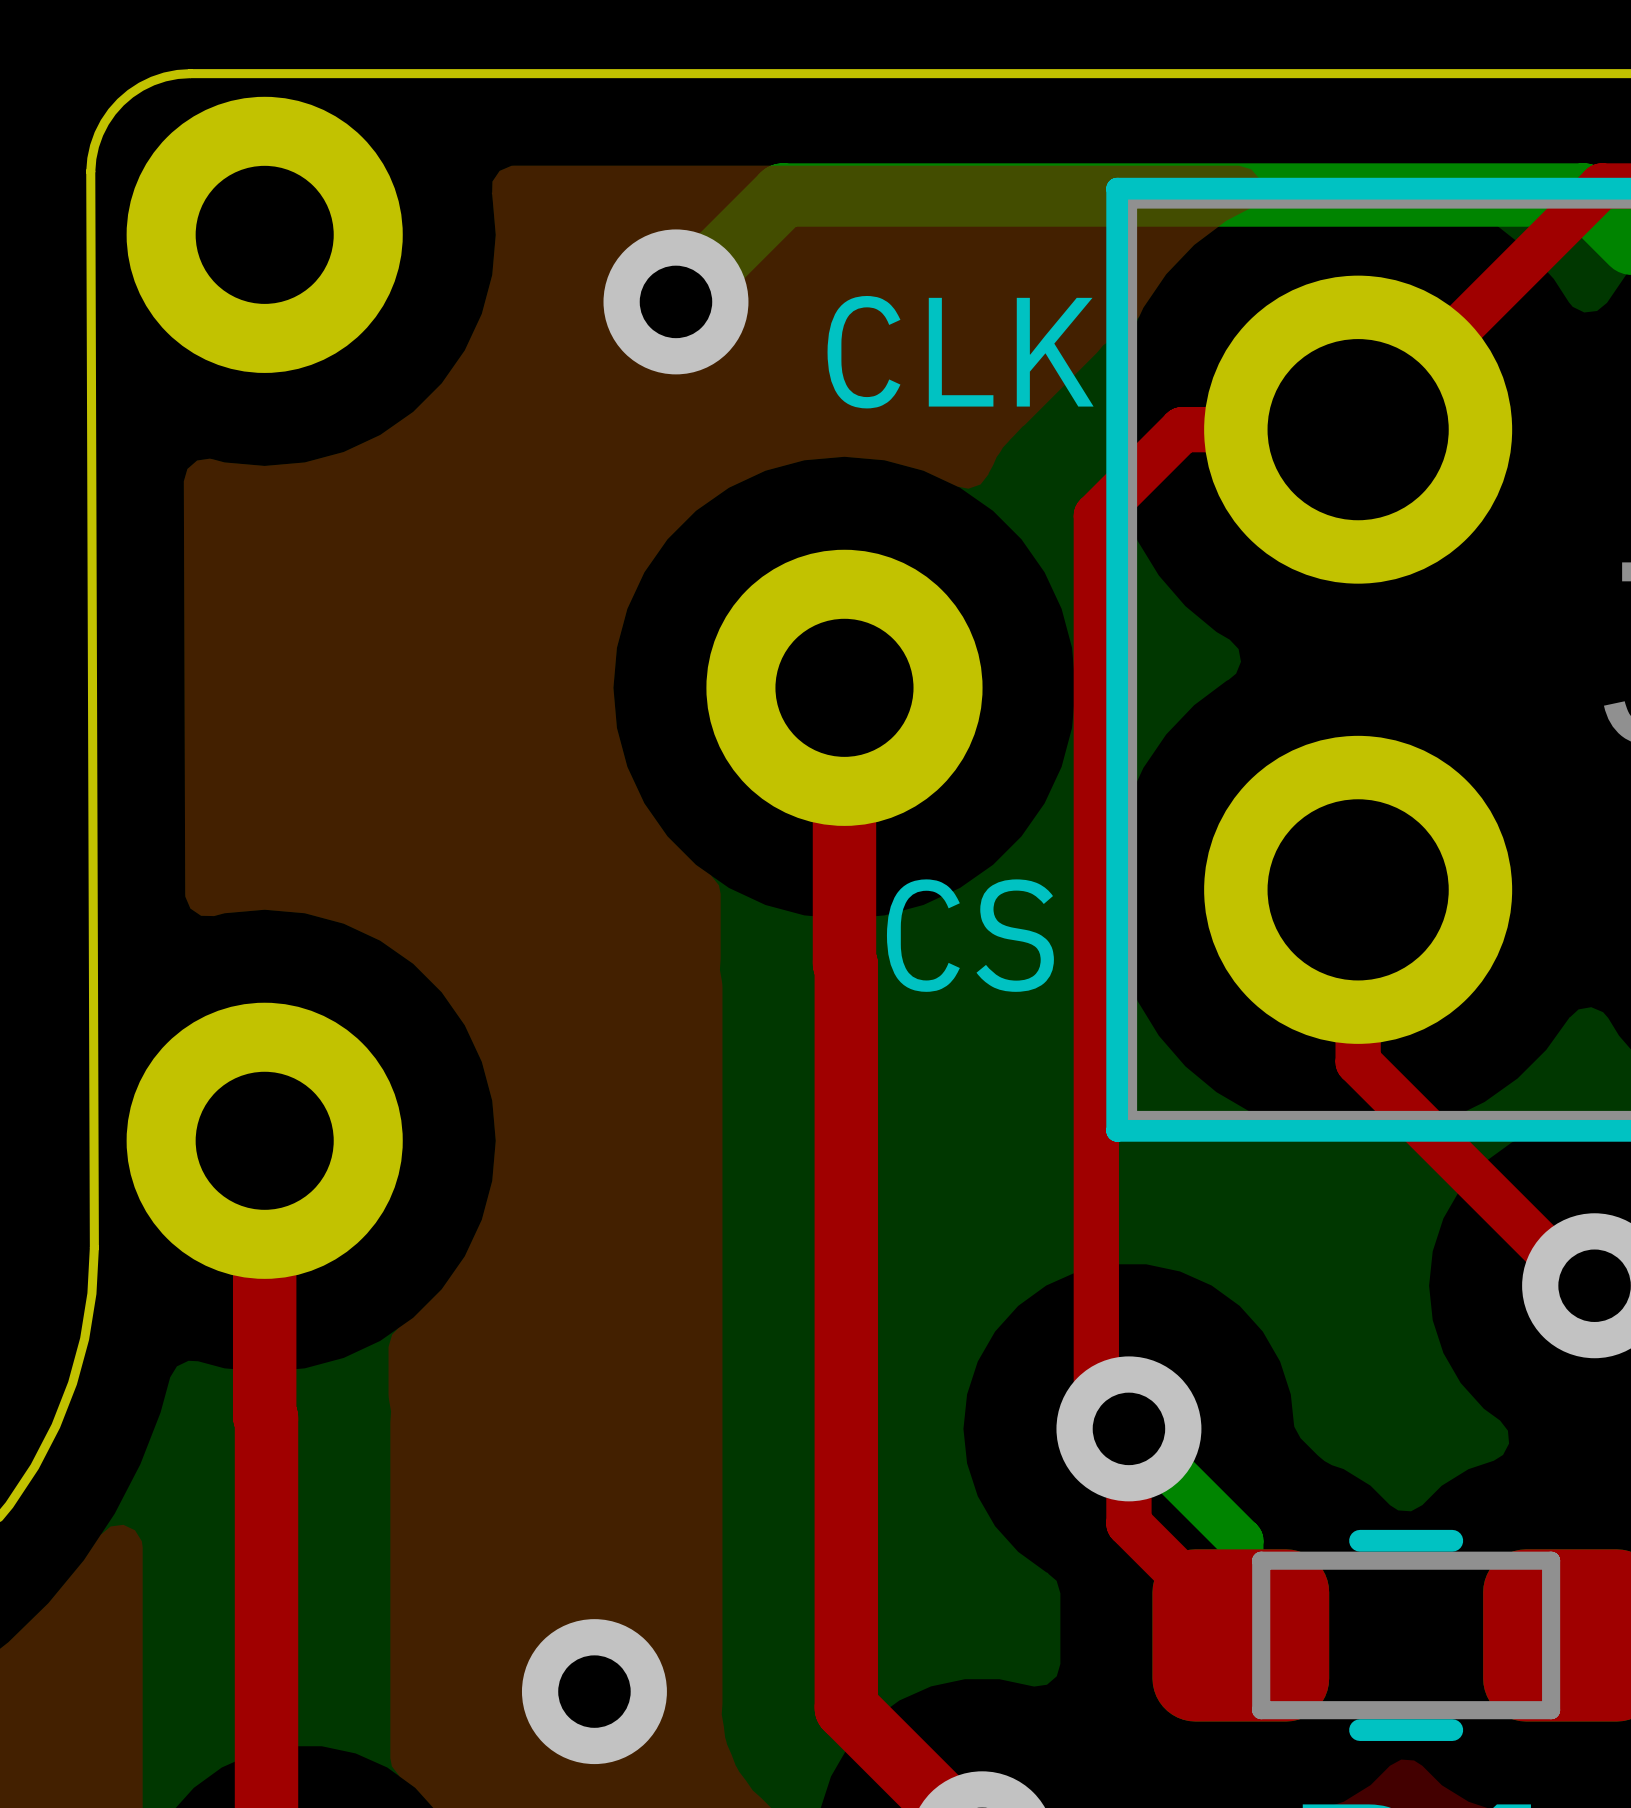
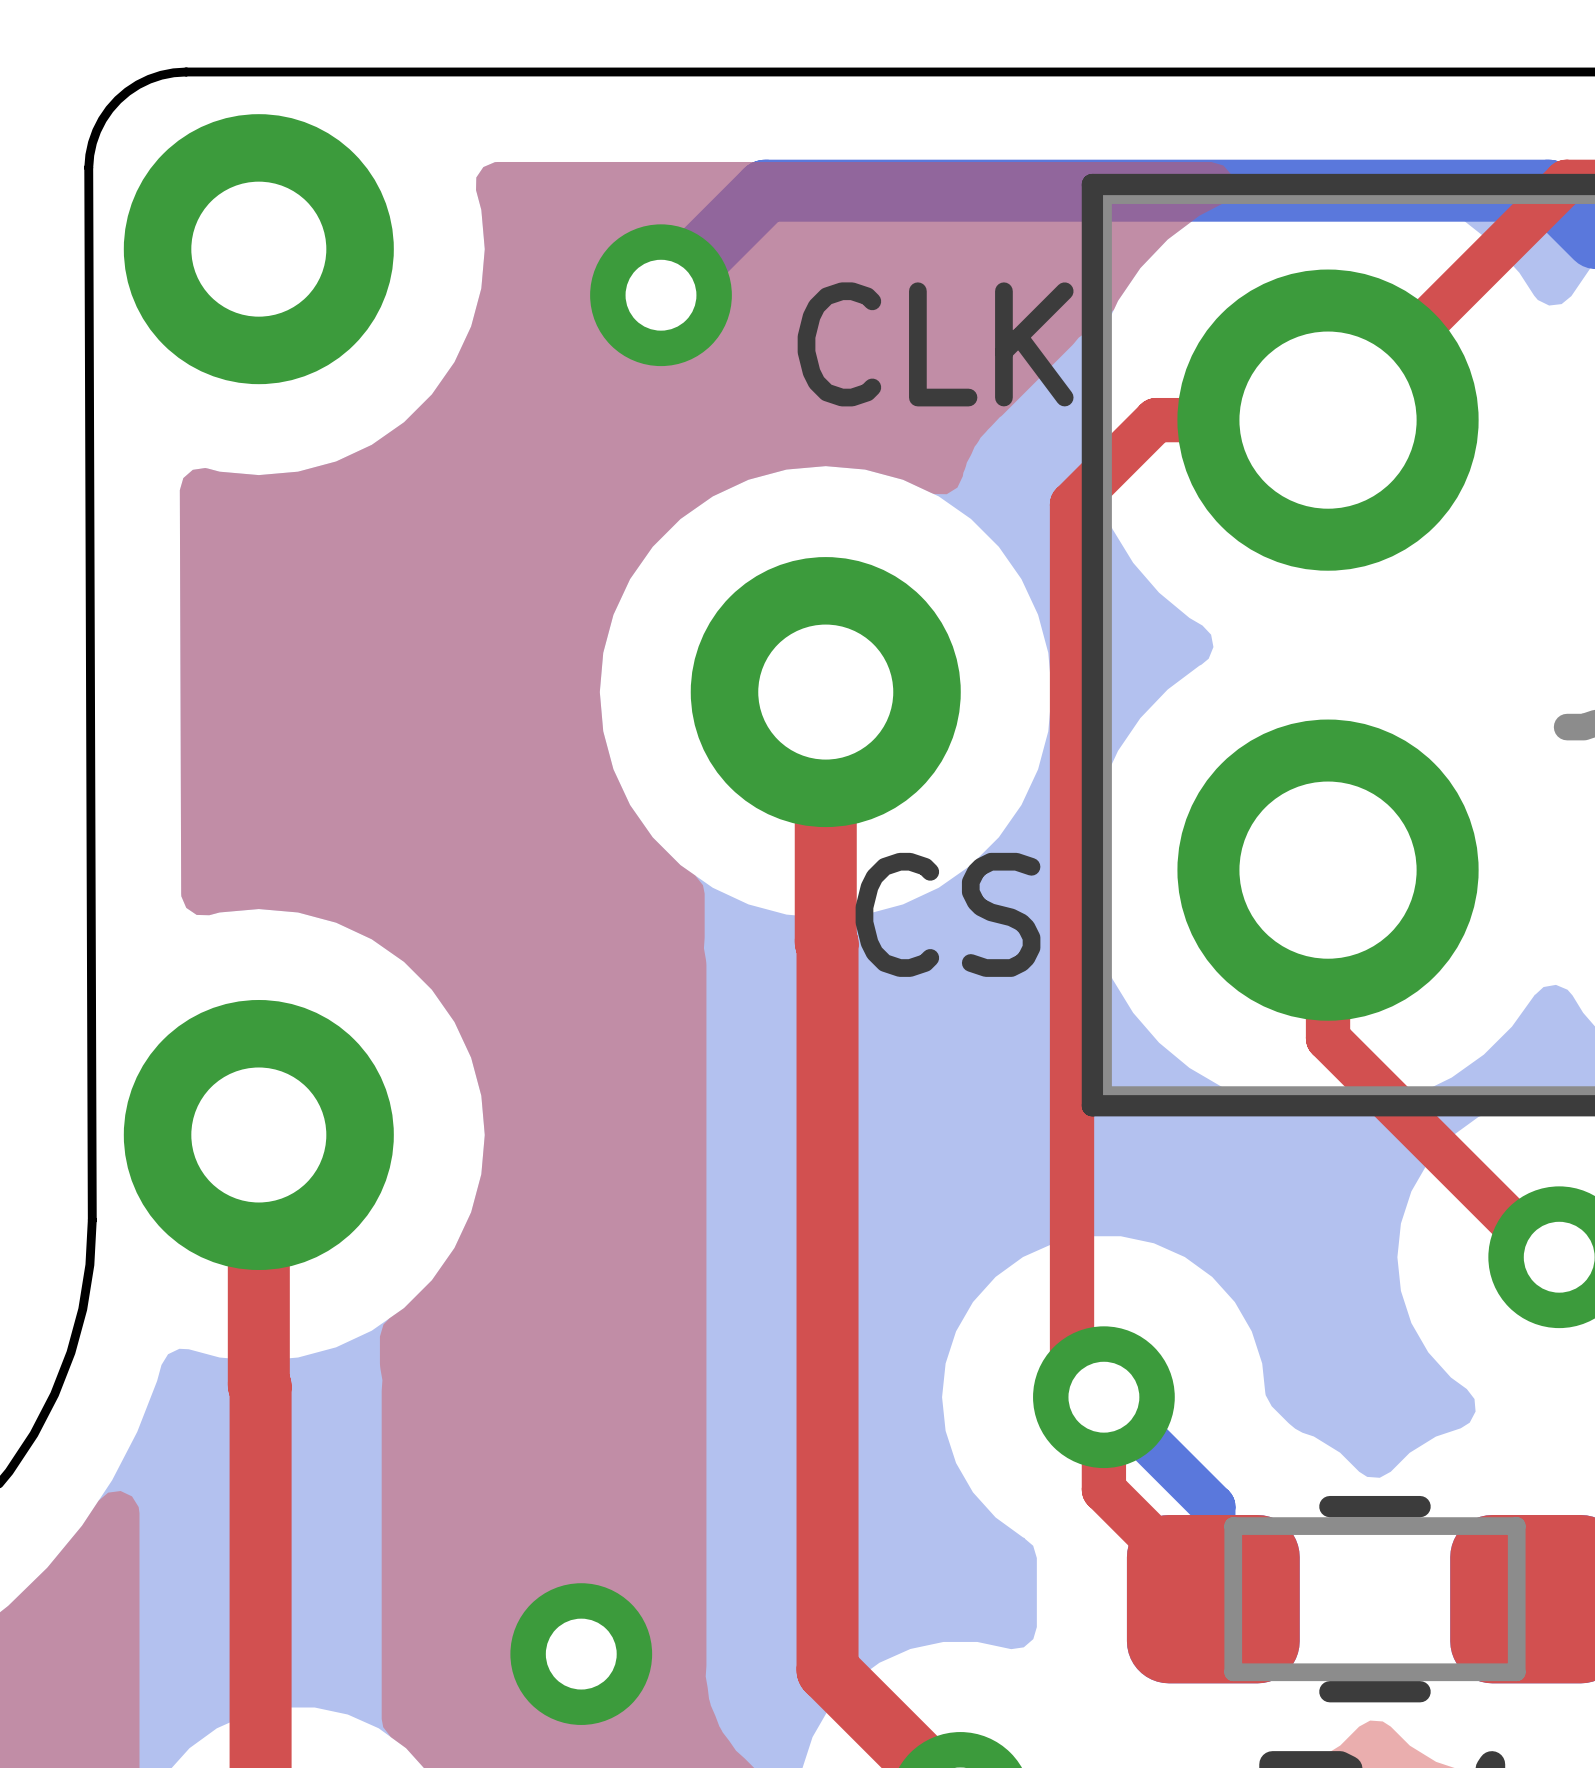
part position: (554, 687) -> (542, 692)

